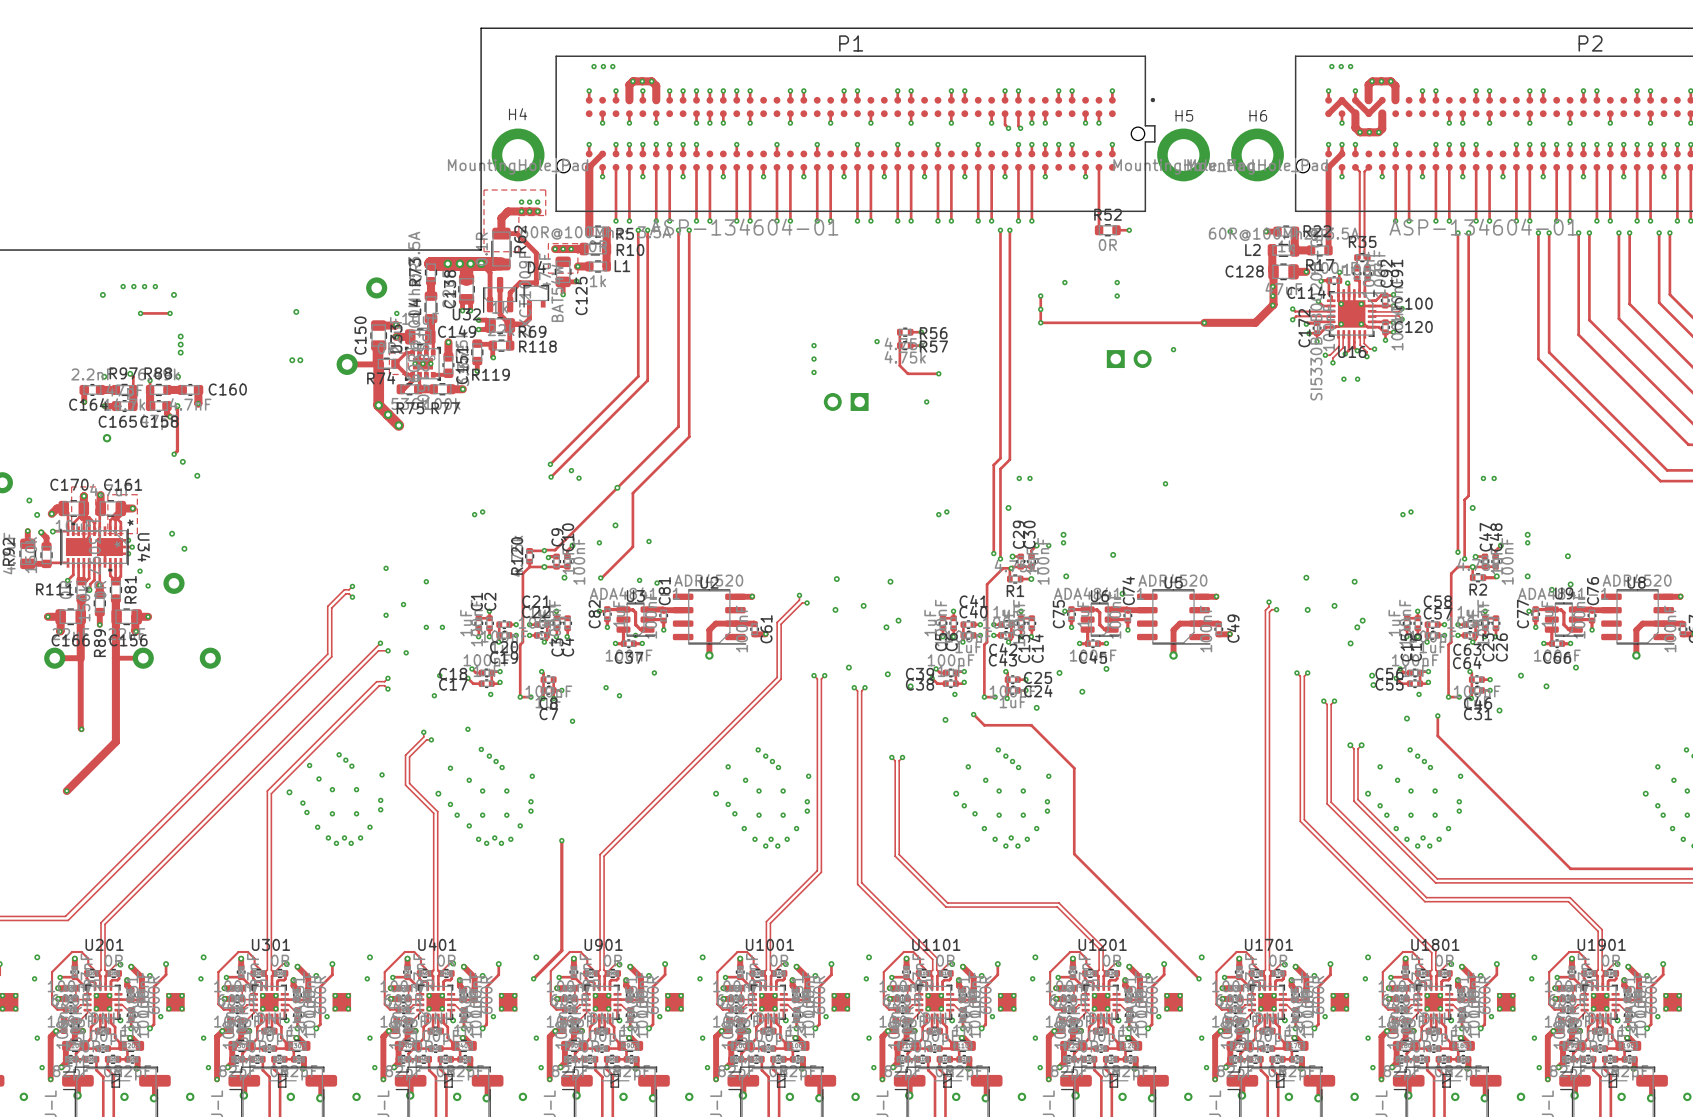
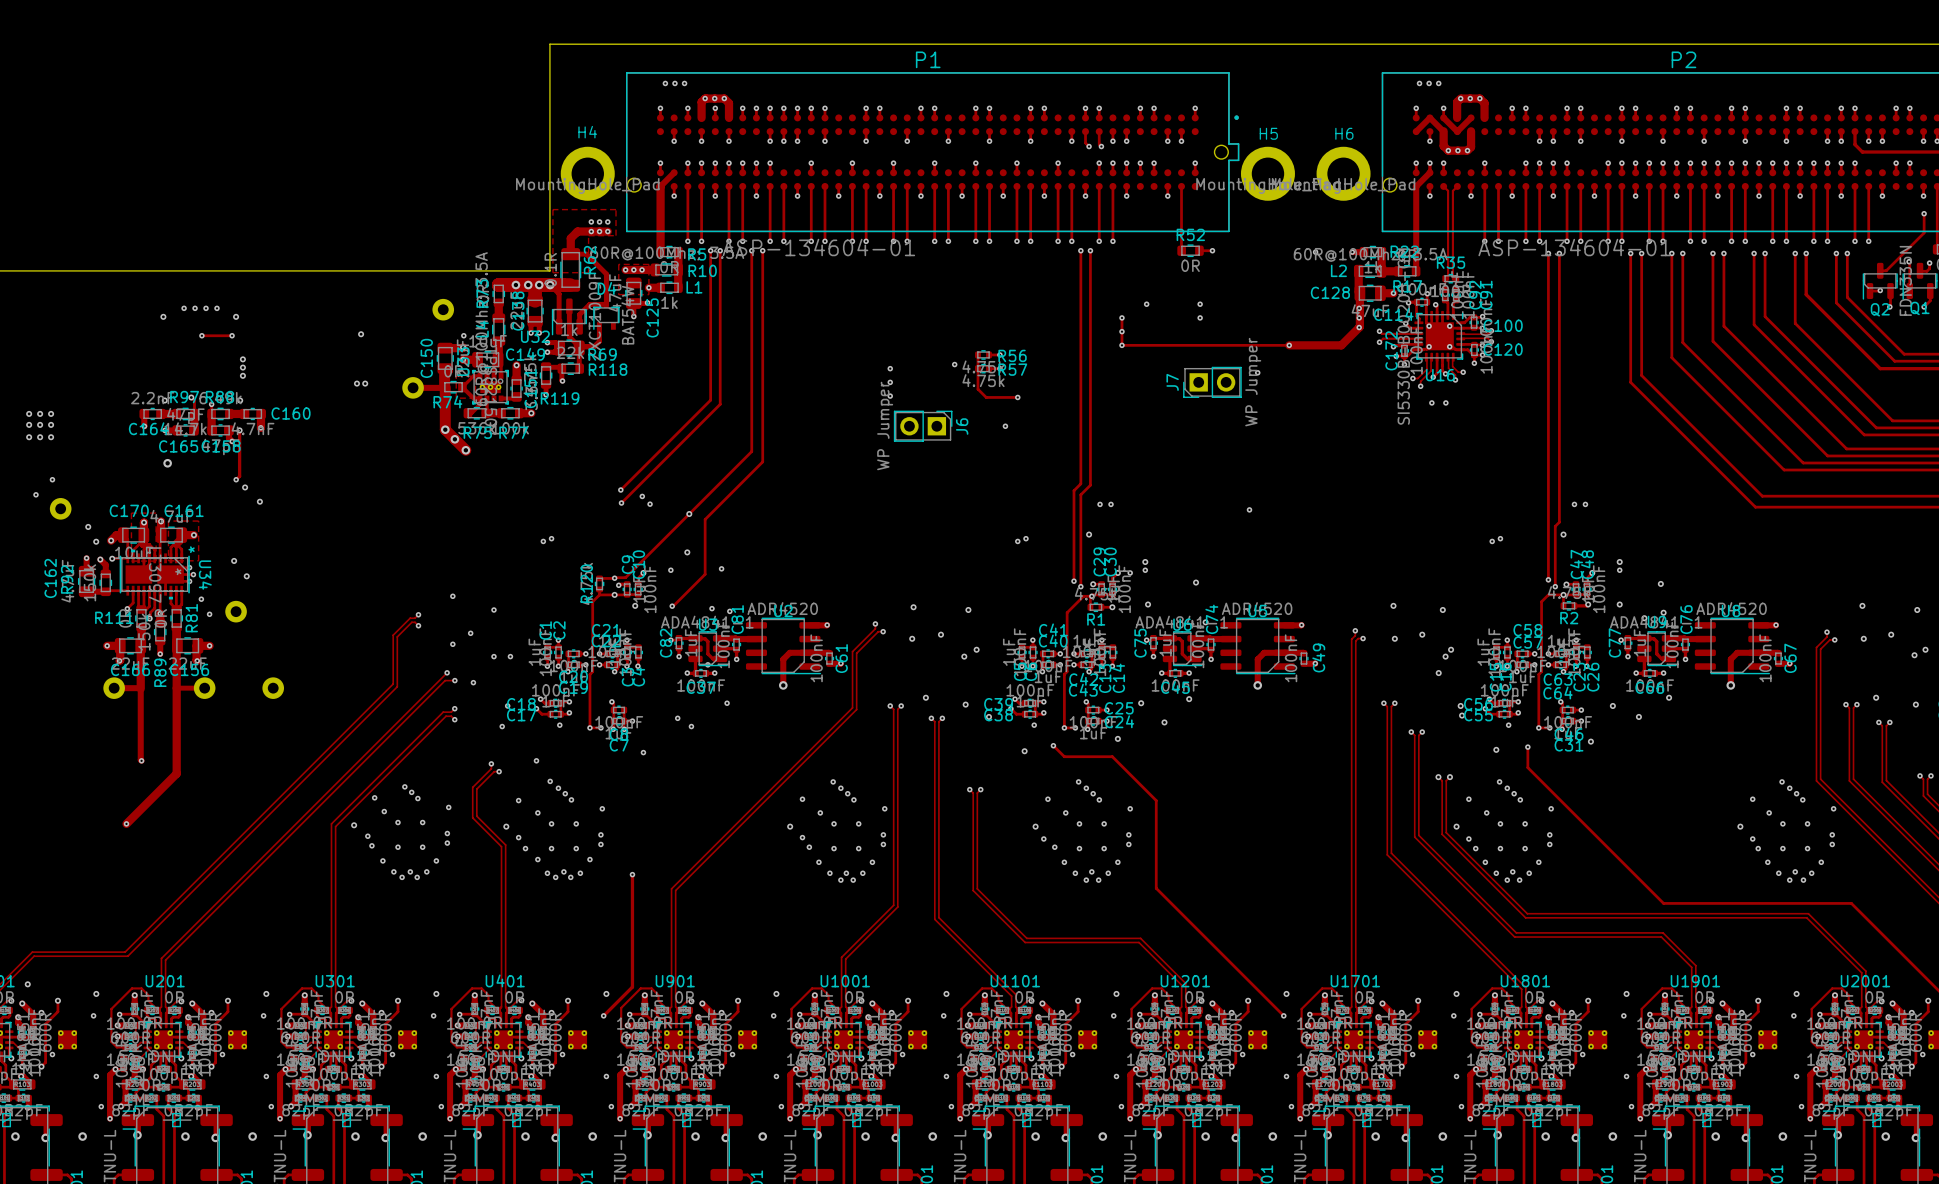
J7 side: bottom (1129, 359) -> top (1212, 382)
J6 side: bottom (846, 401) -> top (923, 426)

